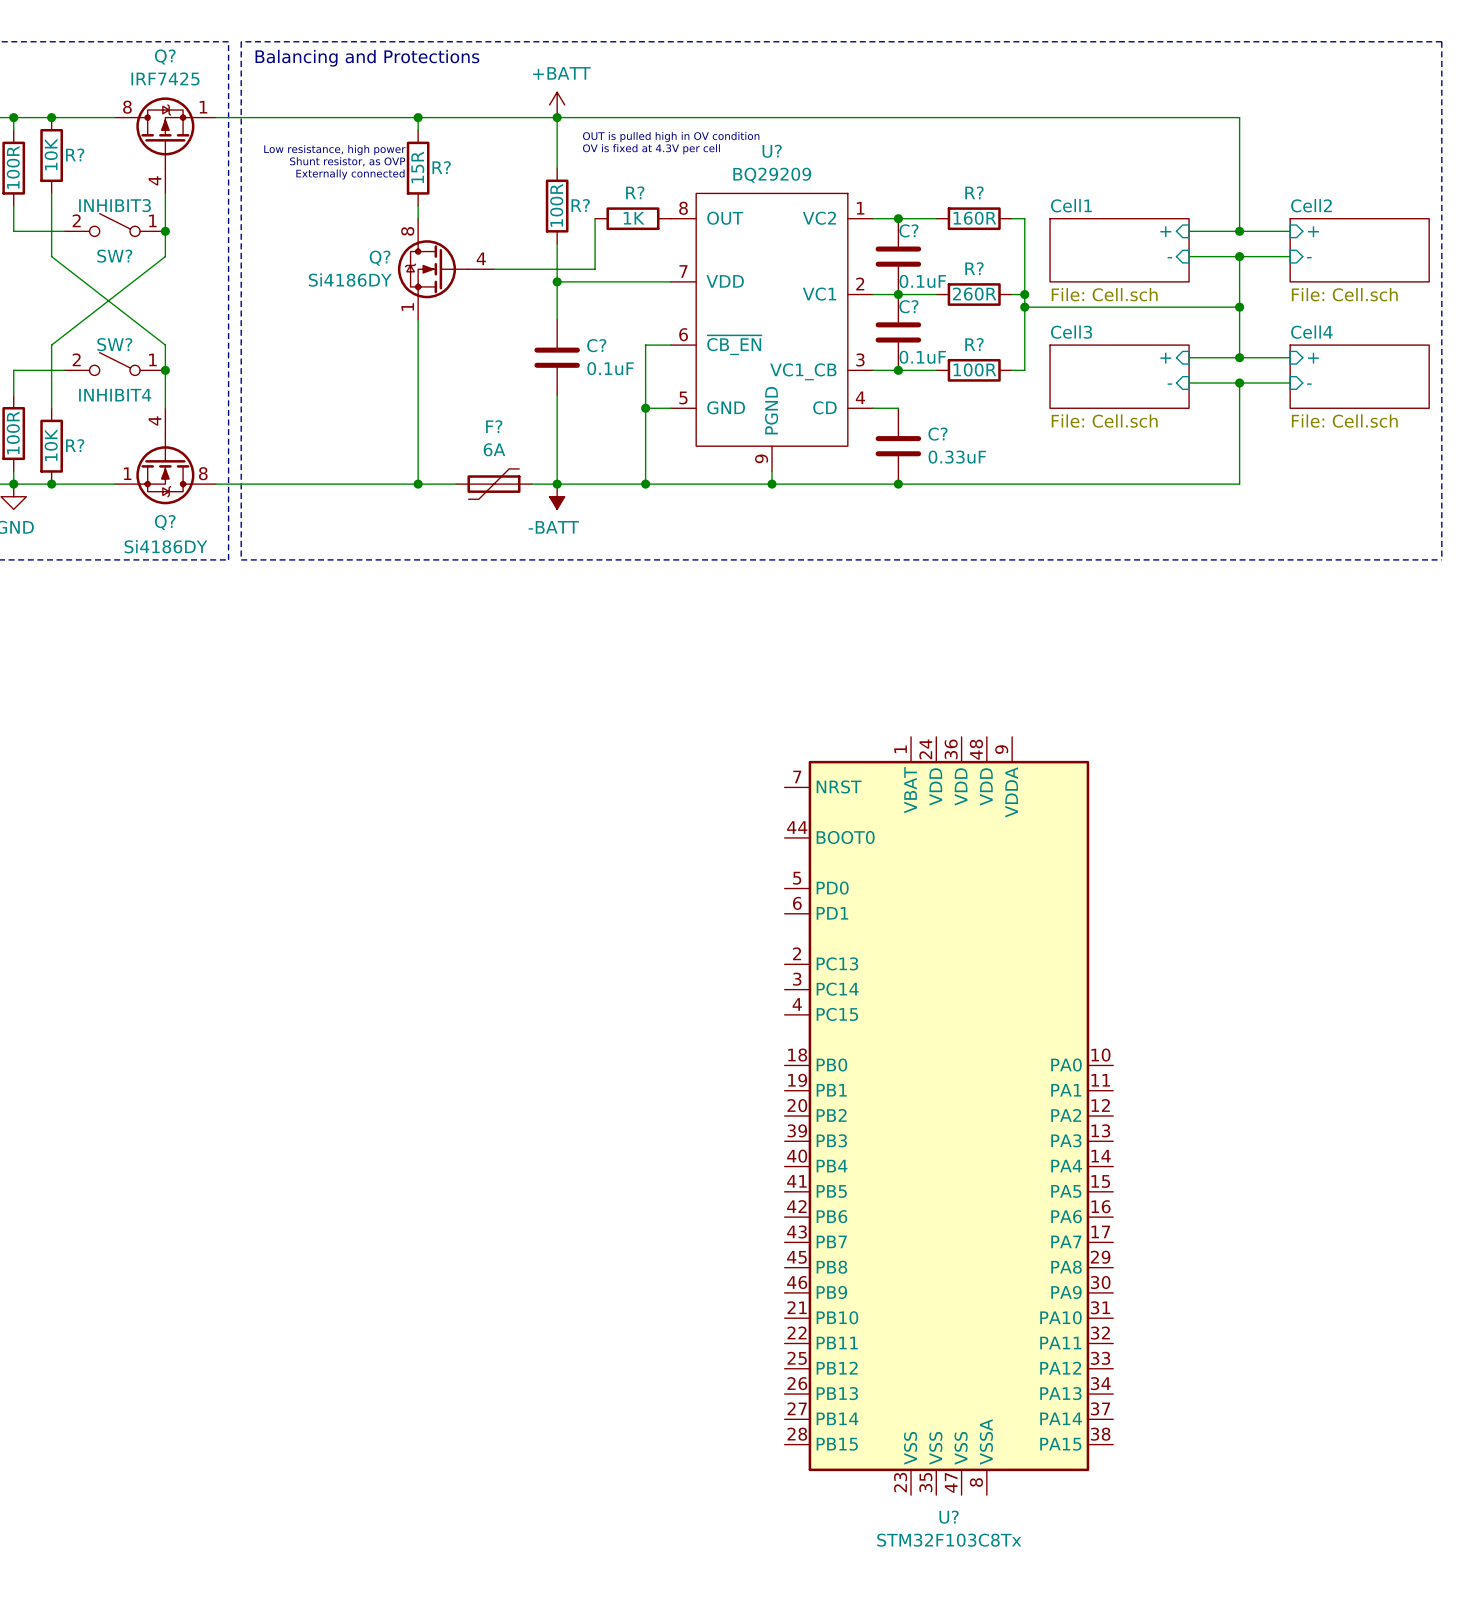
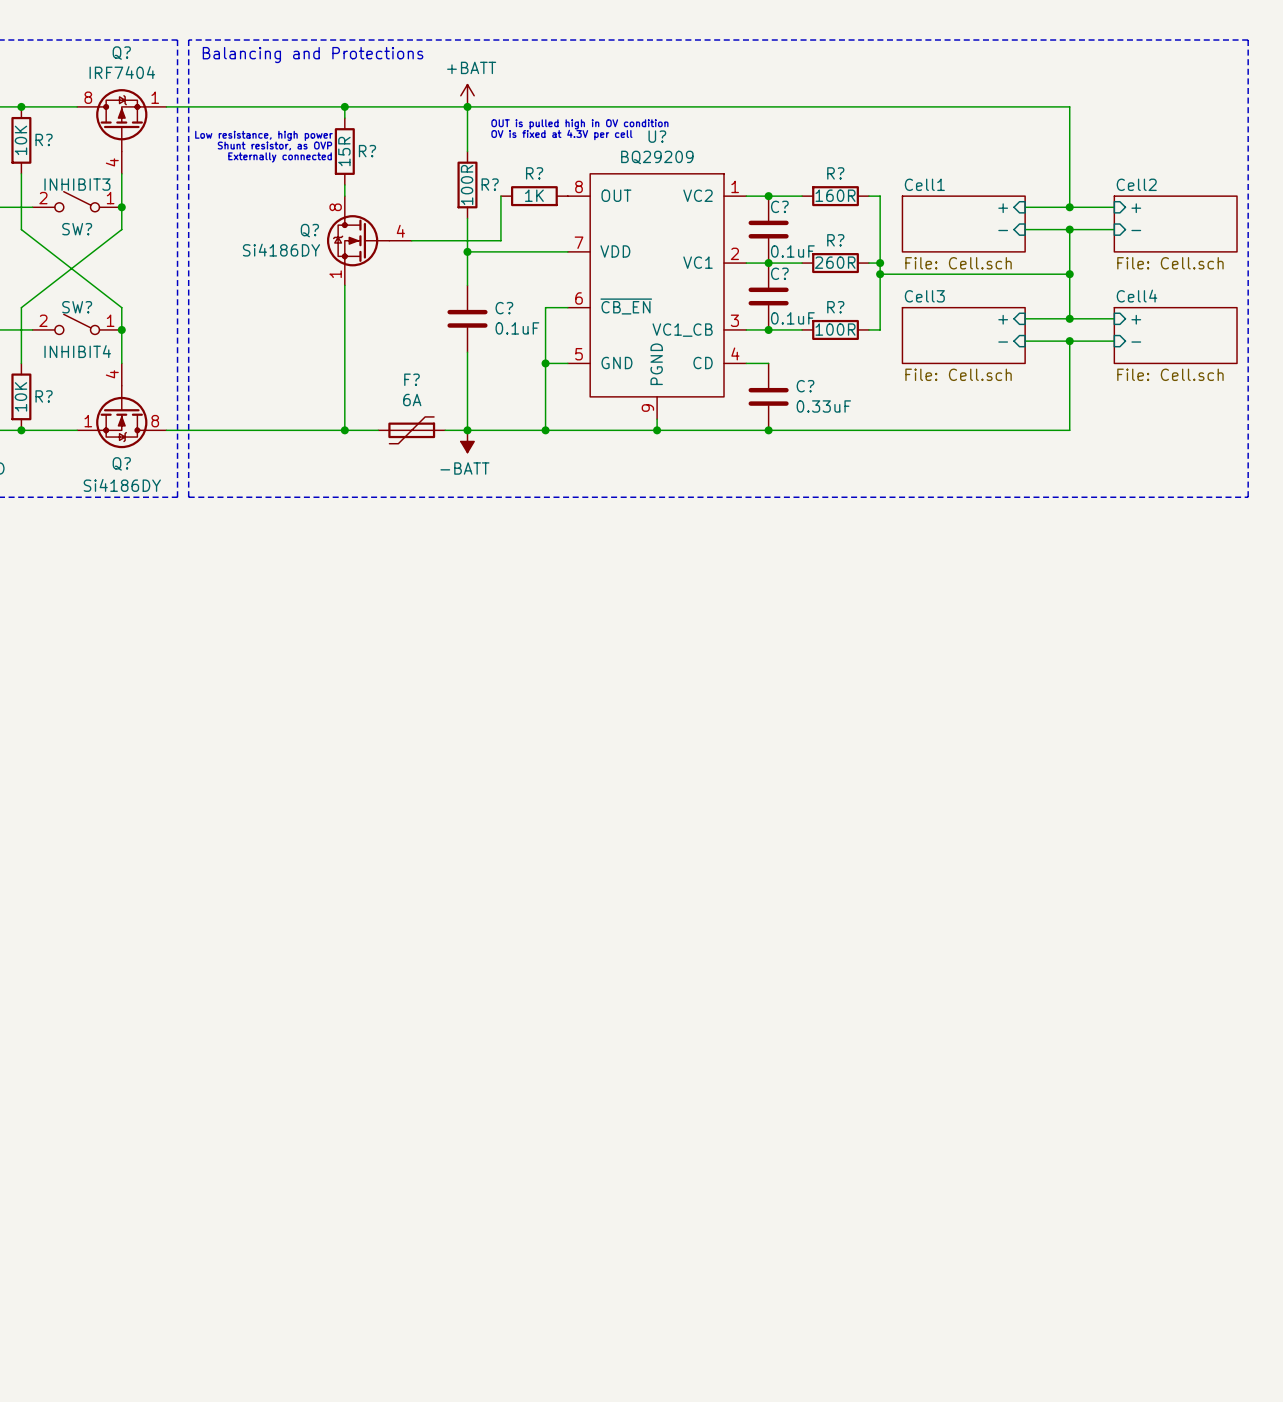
Q? value: IRF7425 (165, 78) -> IRF7404 (122, 72)
U?: STM32F103C8Tx (948, 1116) -> none

